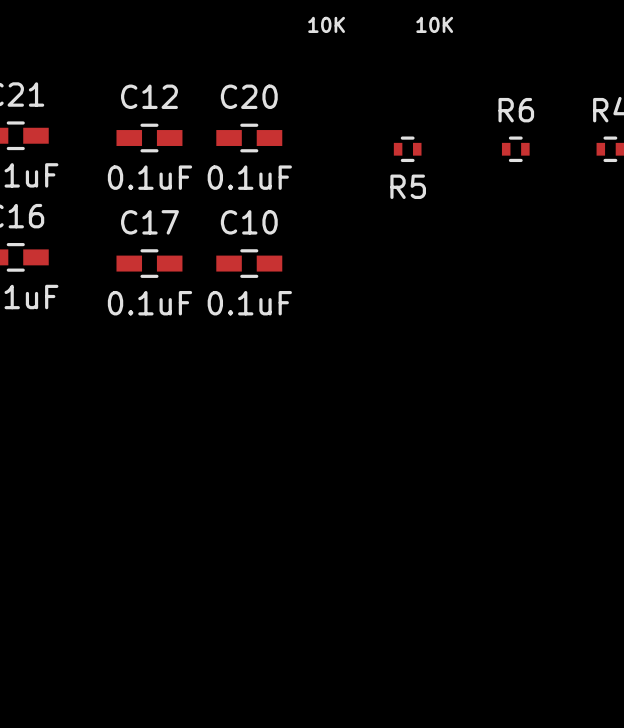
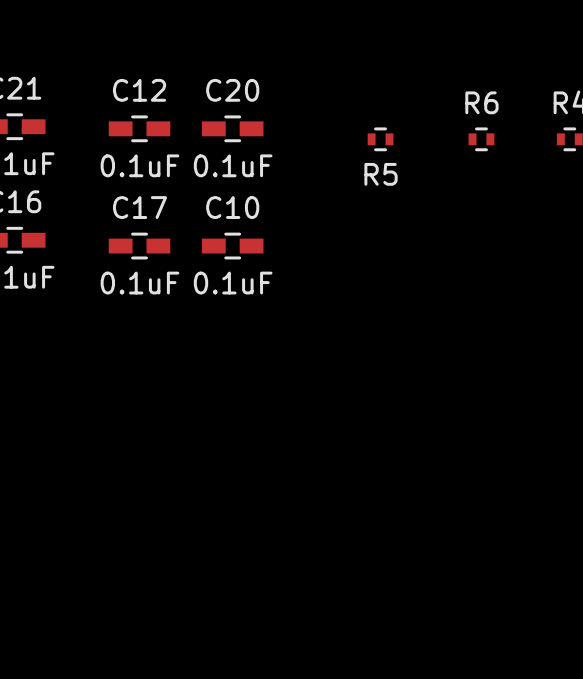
part value: 10K (326, 24) -> none
part value: 10K (434, 24) -> none

